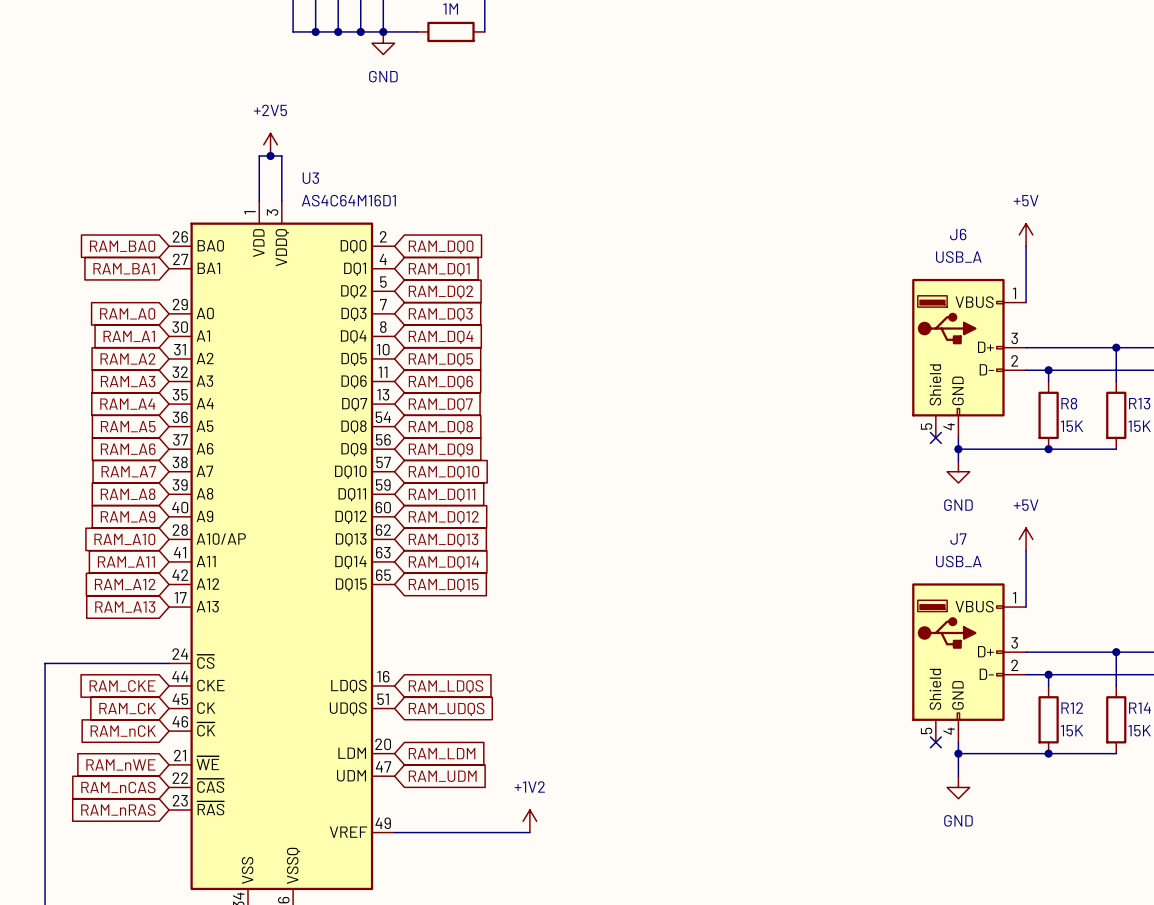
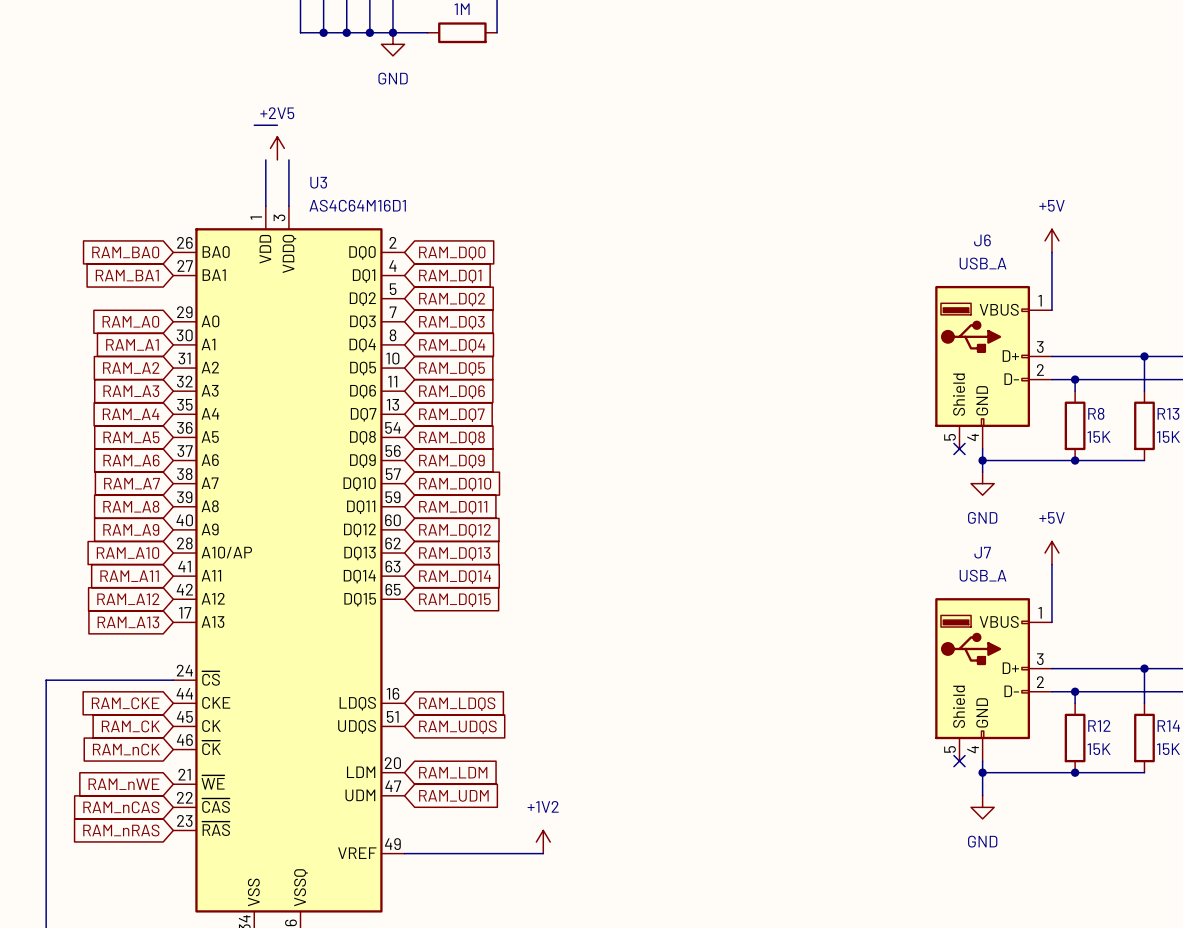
wire: (259, 155) (281, 155) -> (254, 125) (277, 125)
junction: (270, 155) -> none

